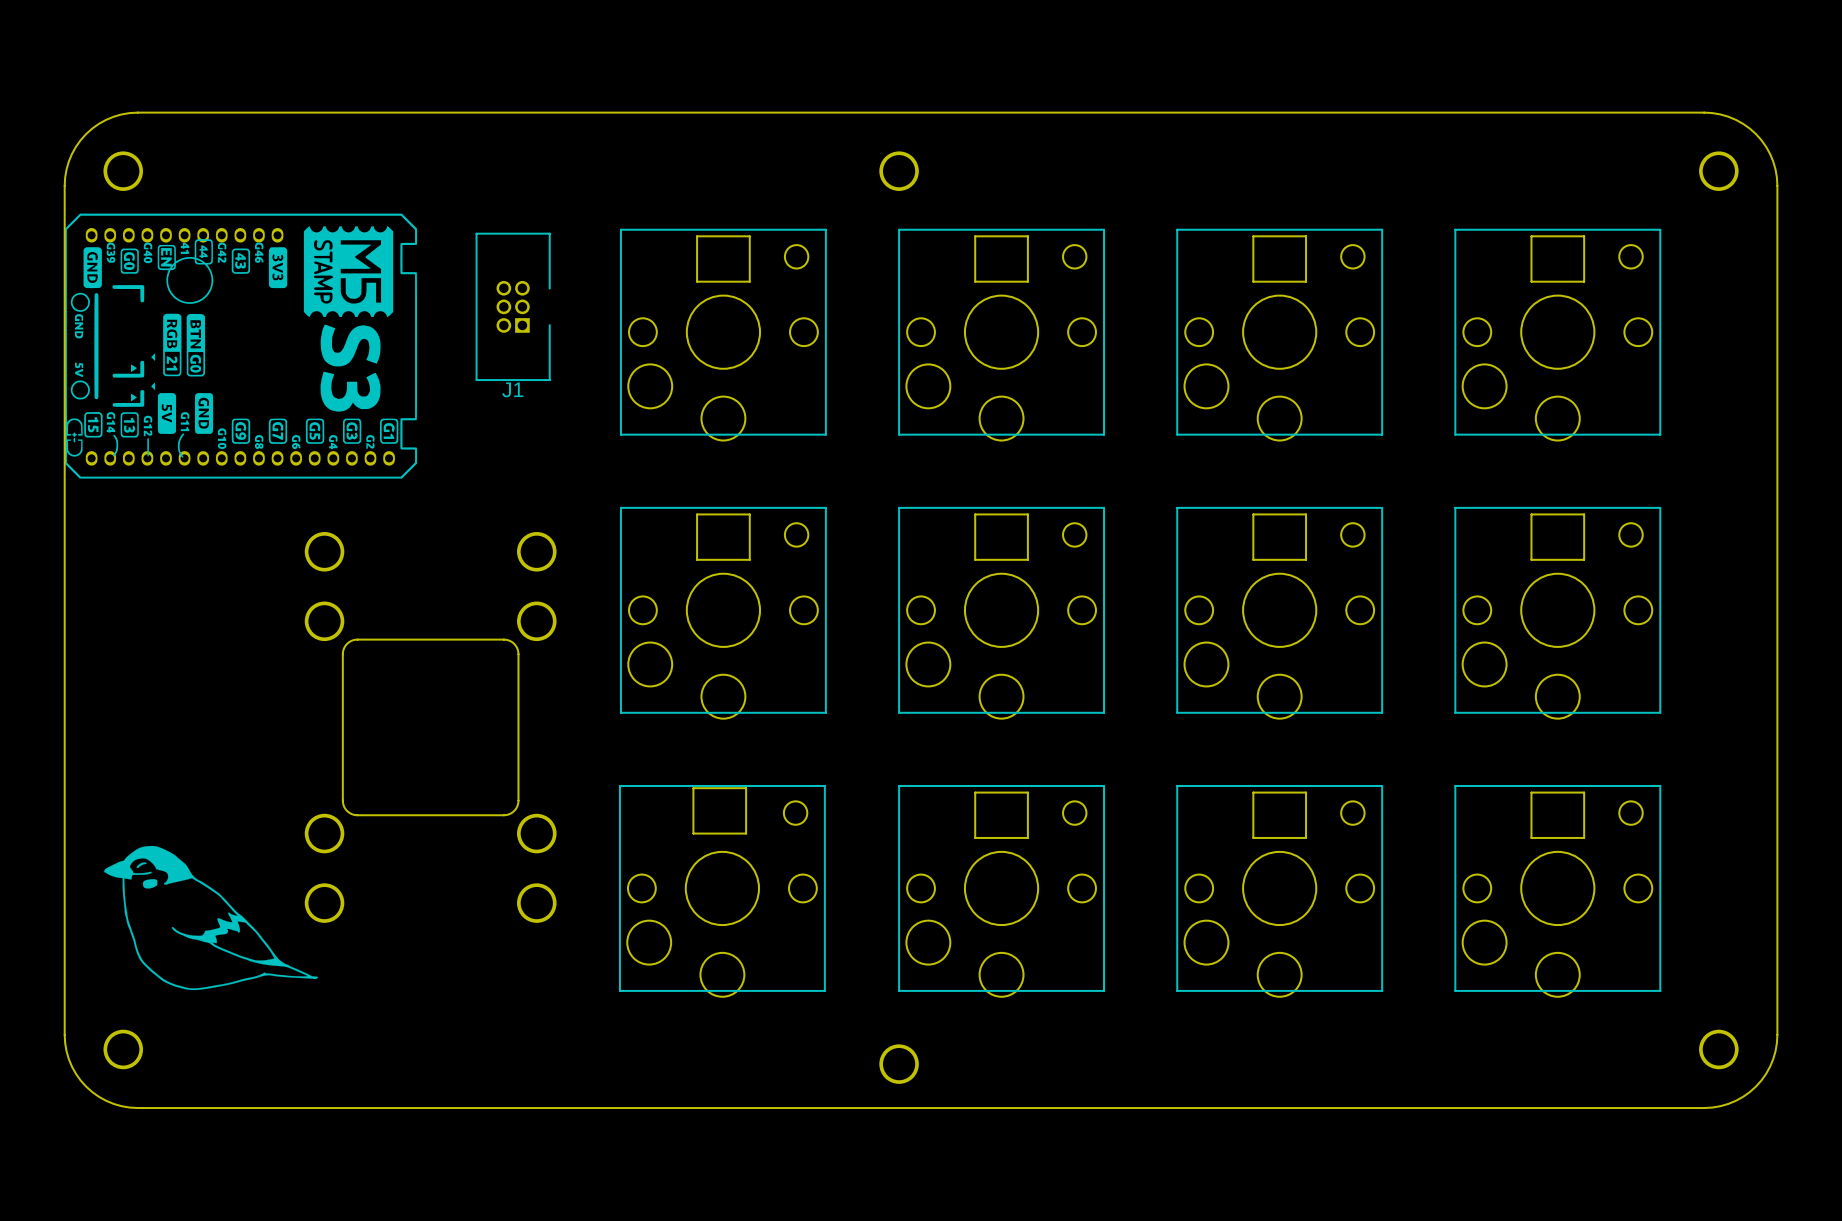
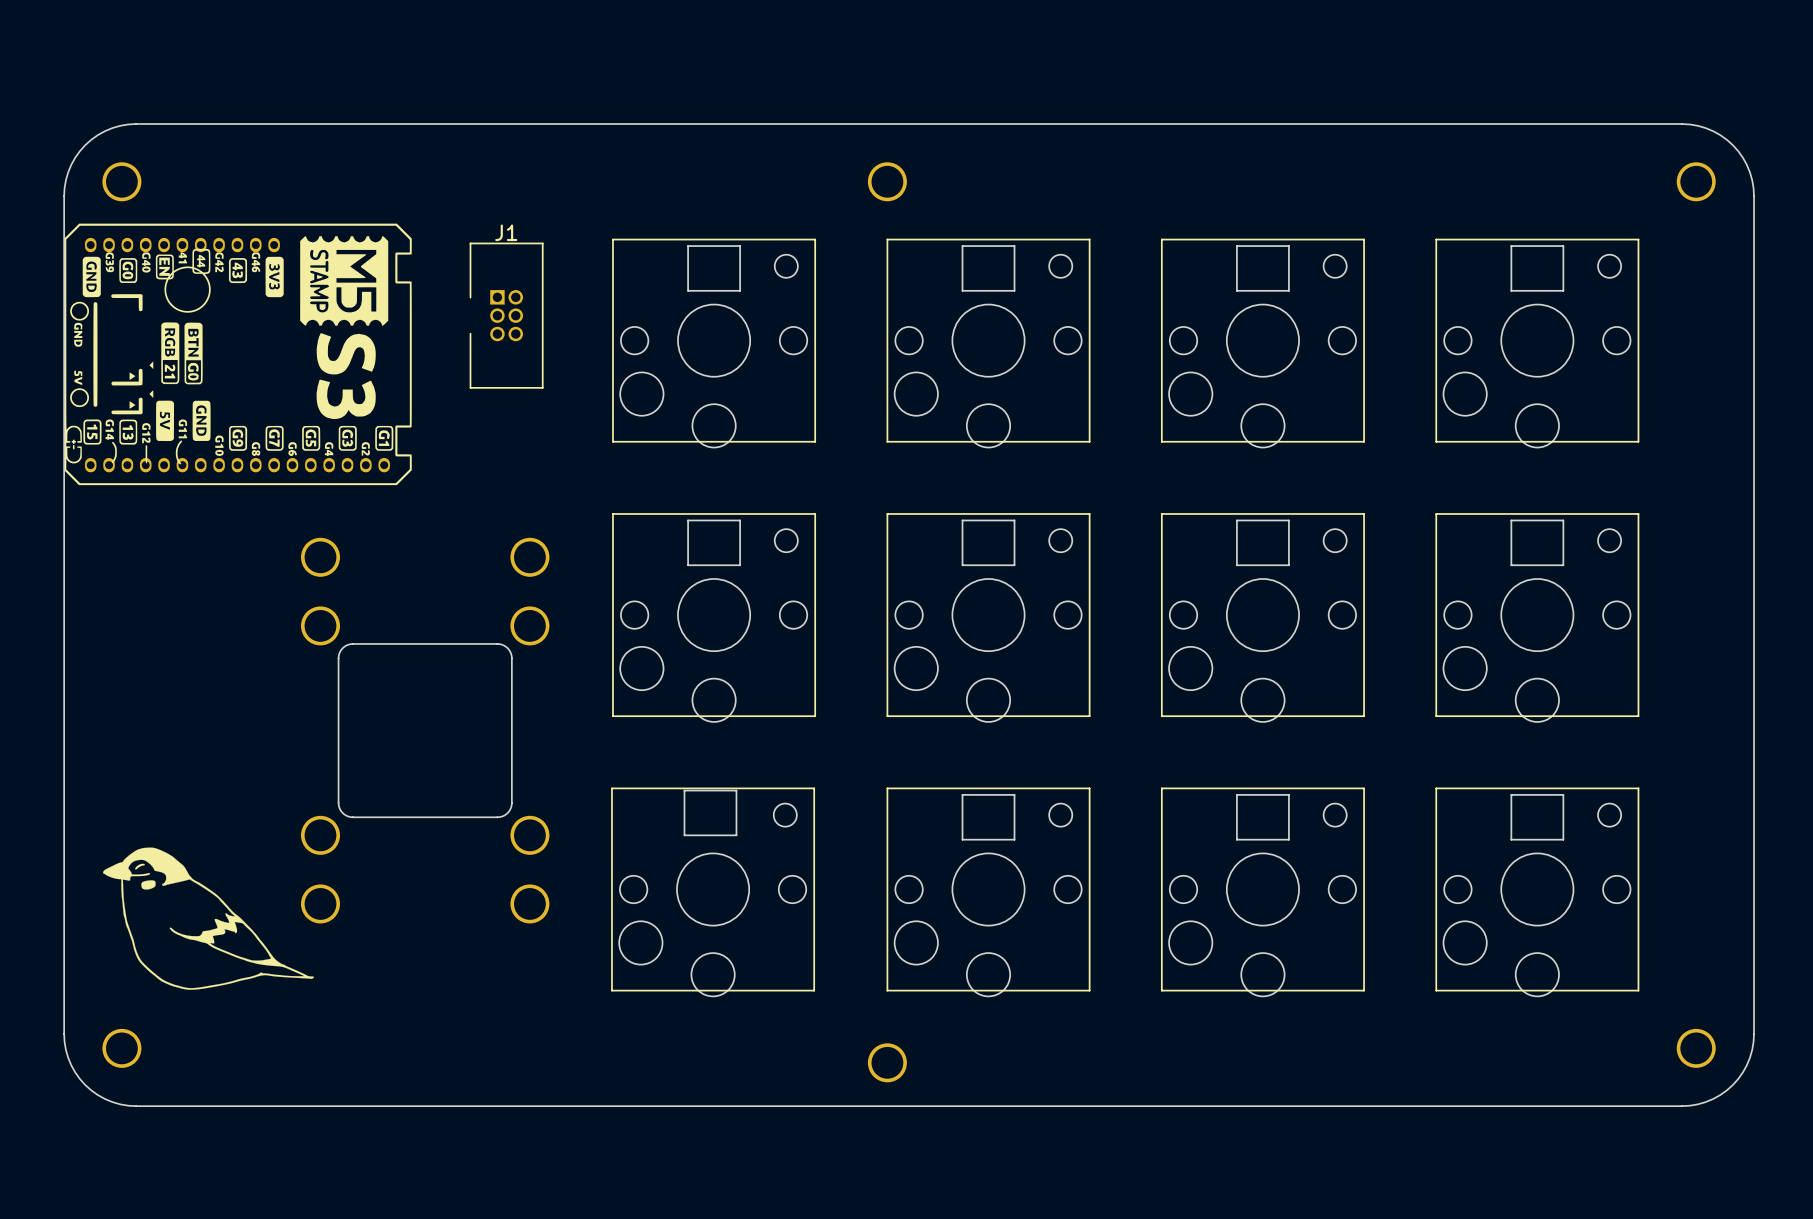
J1 rotation: 0° (513, 306) -> 180° (506, 315)

